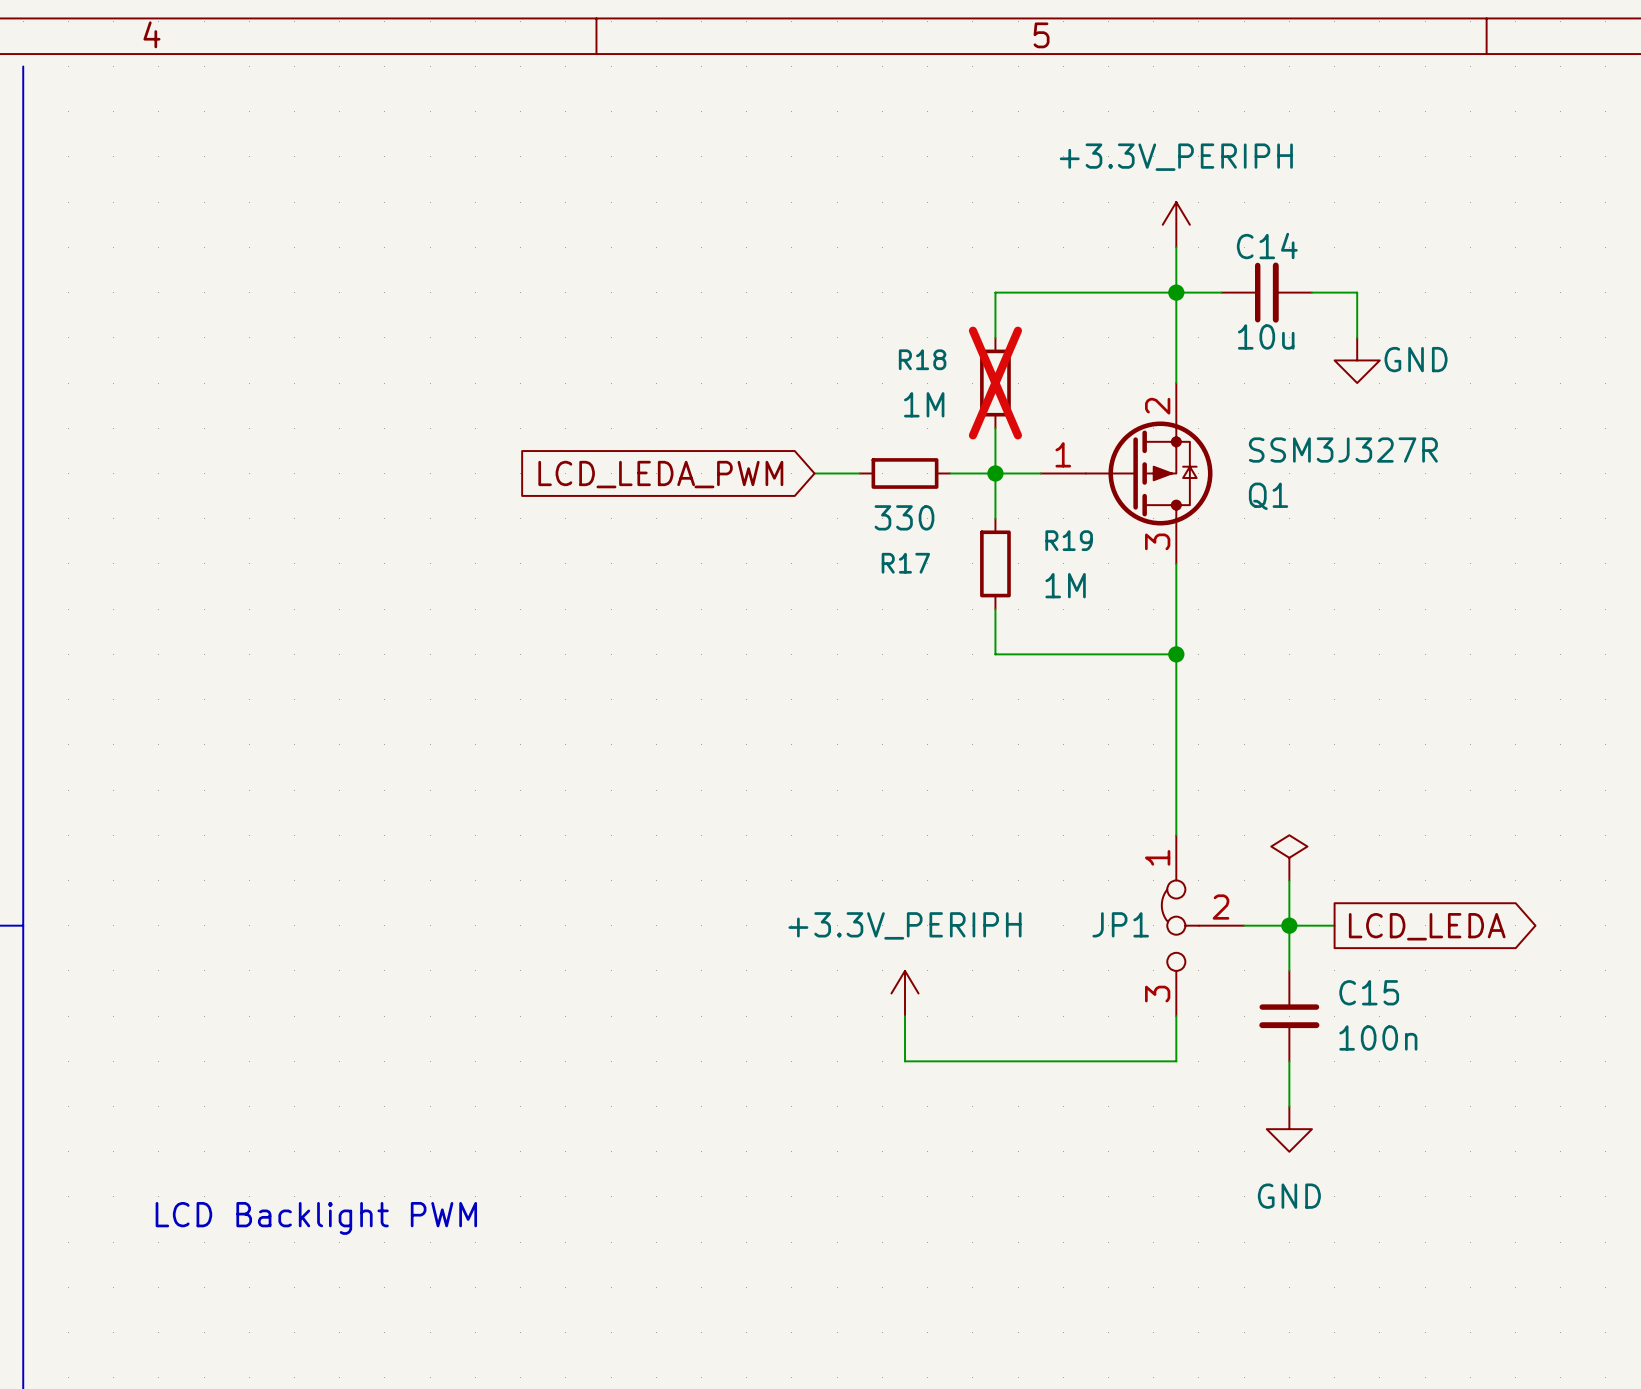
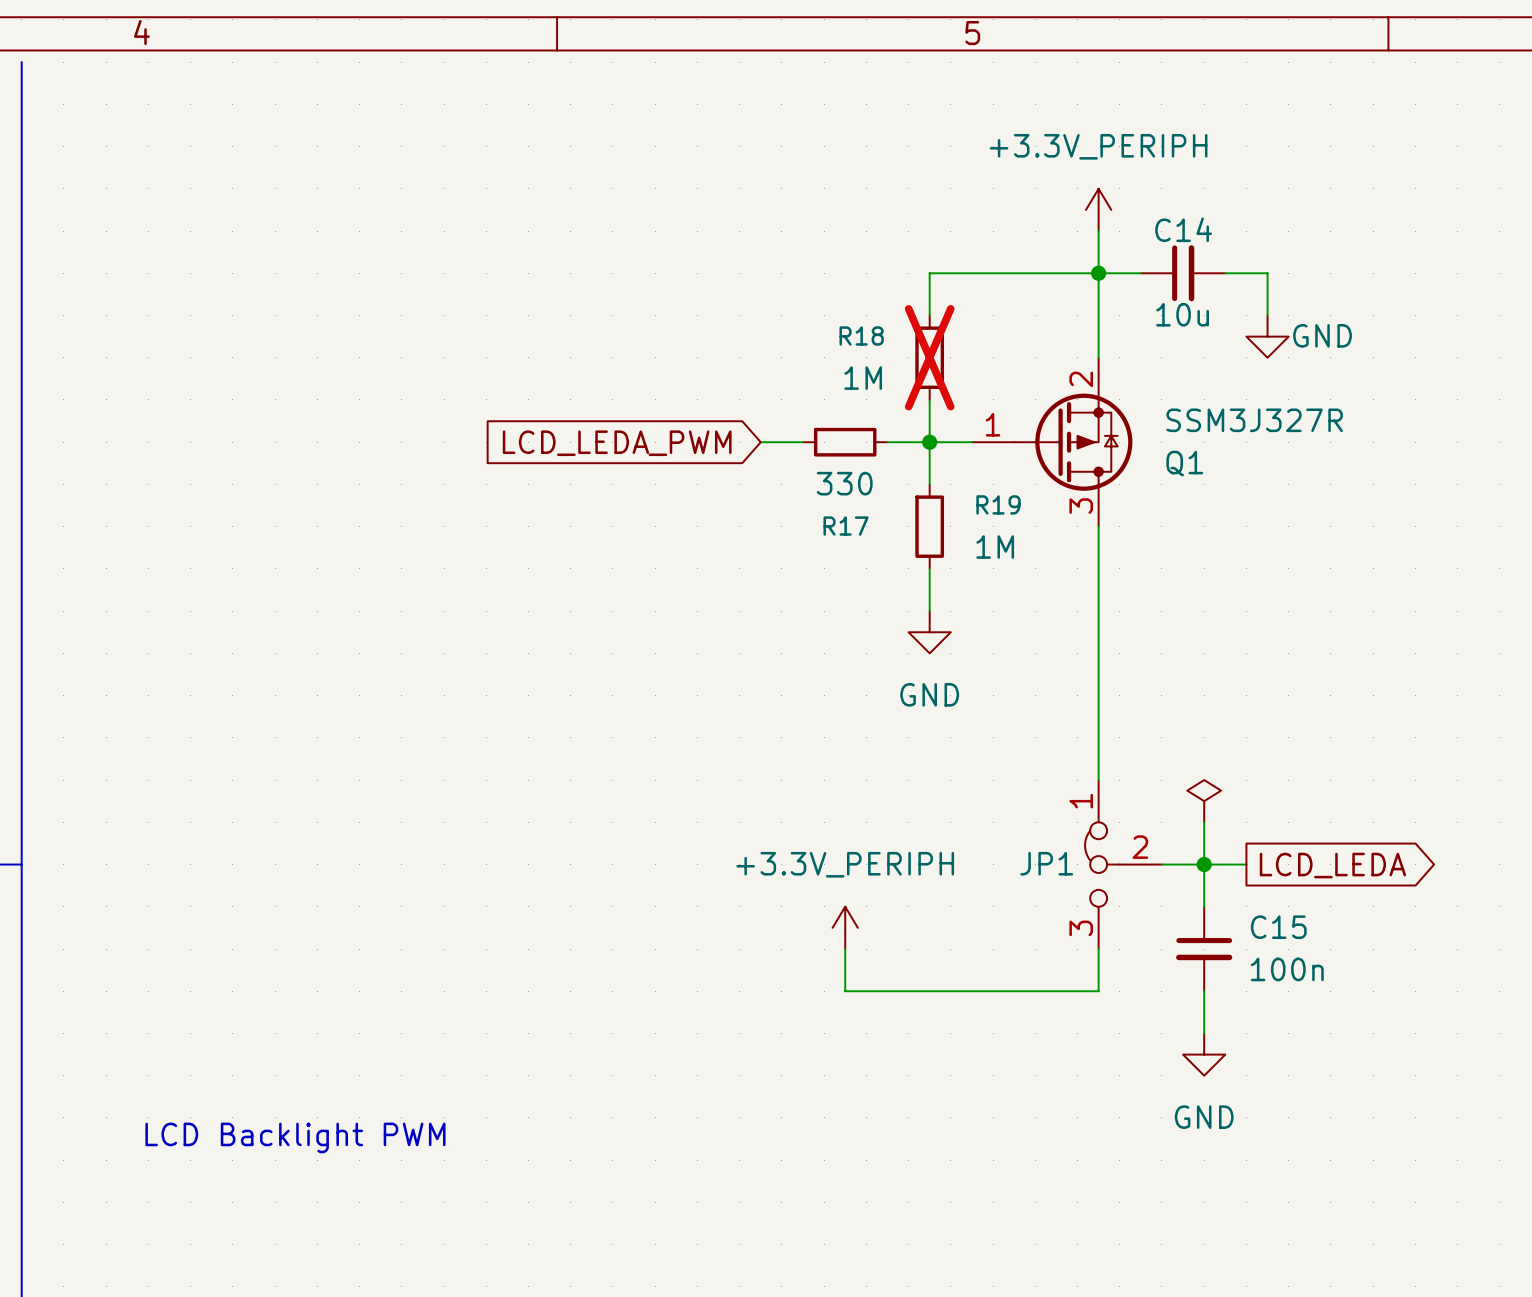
wire: (995, 654) (1176, 654) -> none
junction: (1176, 654) -> none
power symbol: none -> GND (929, 632)

